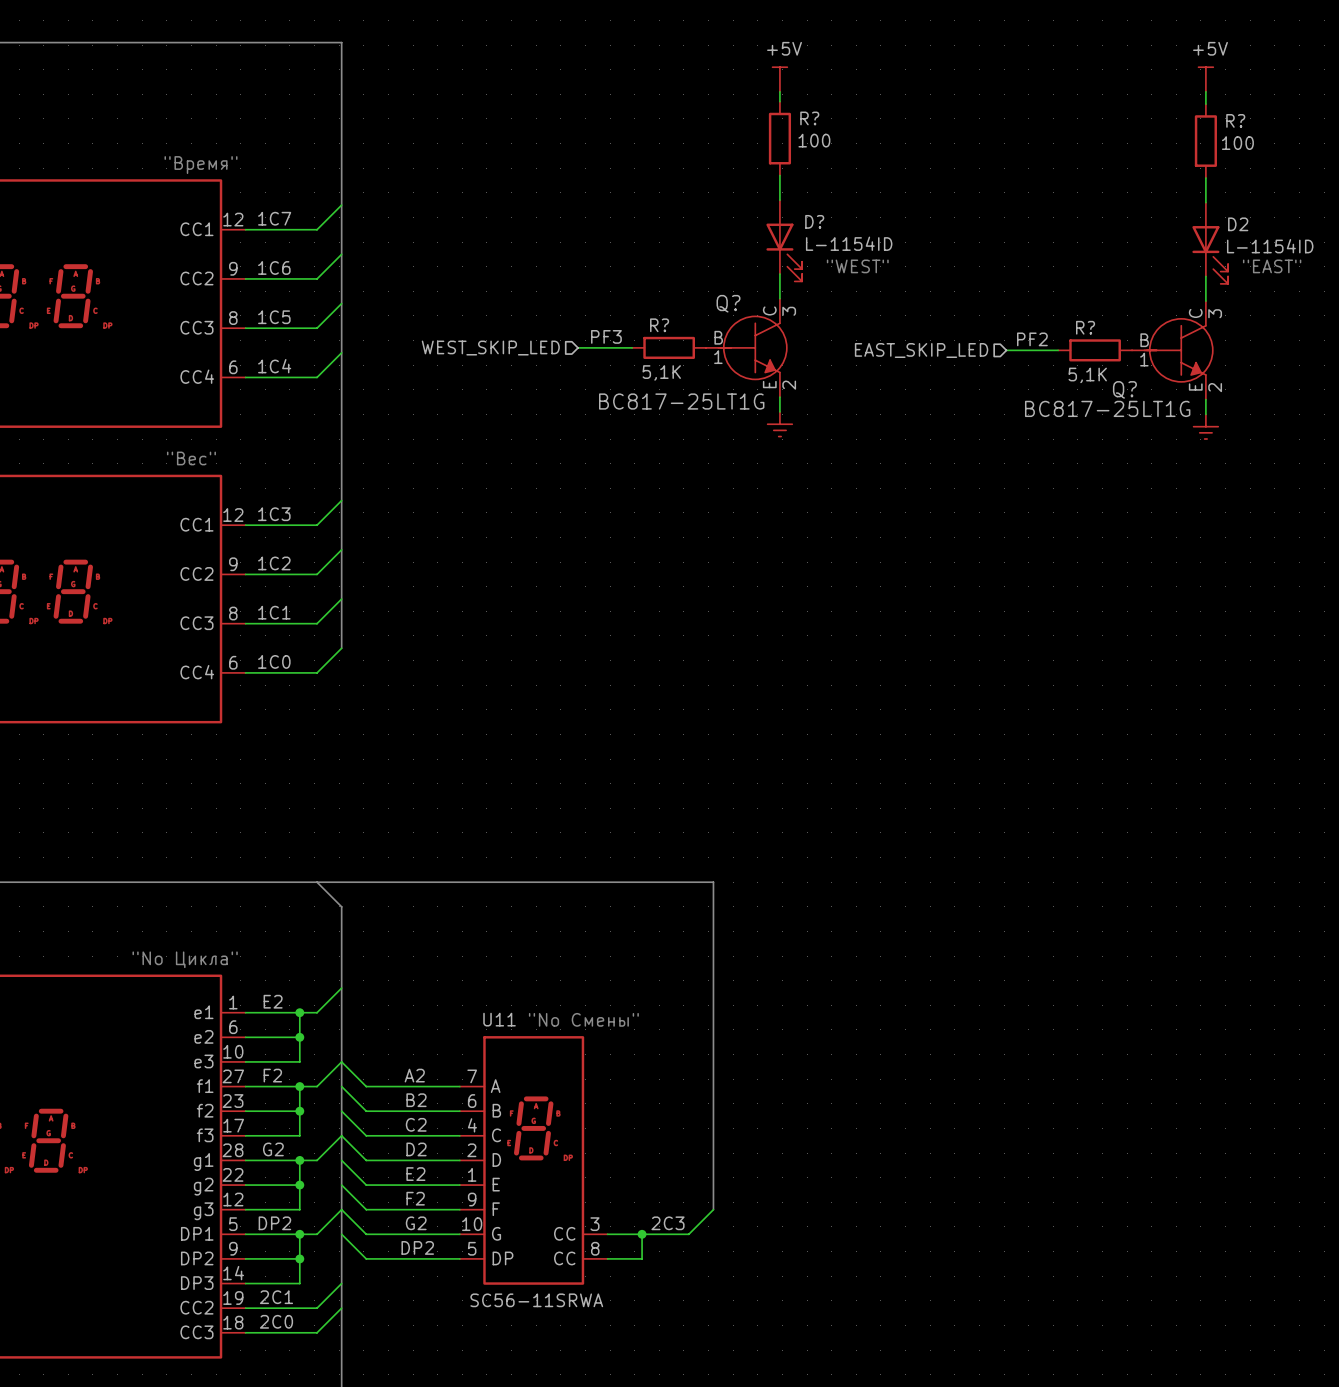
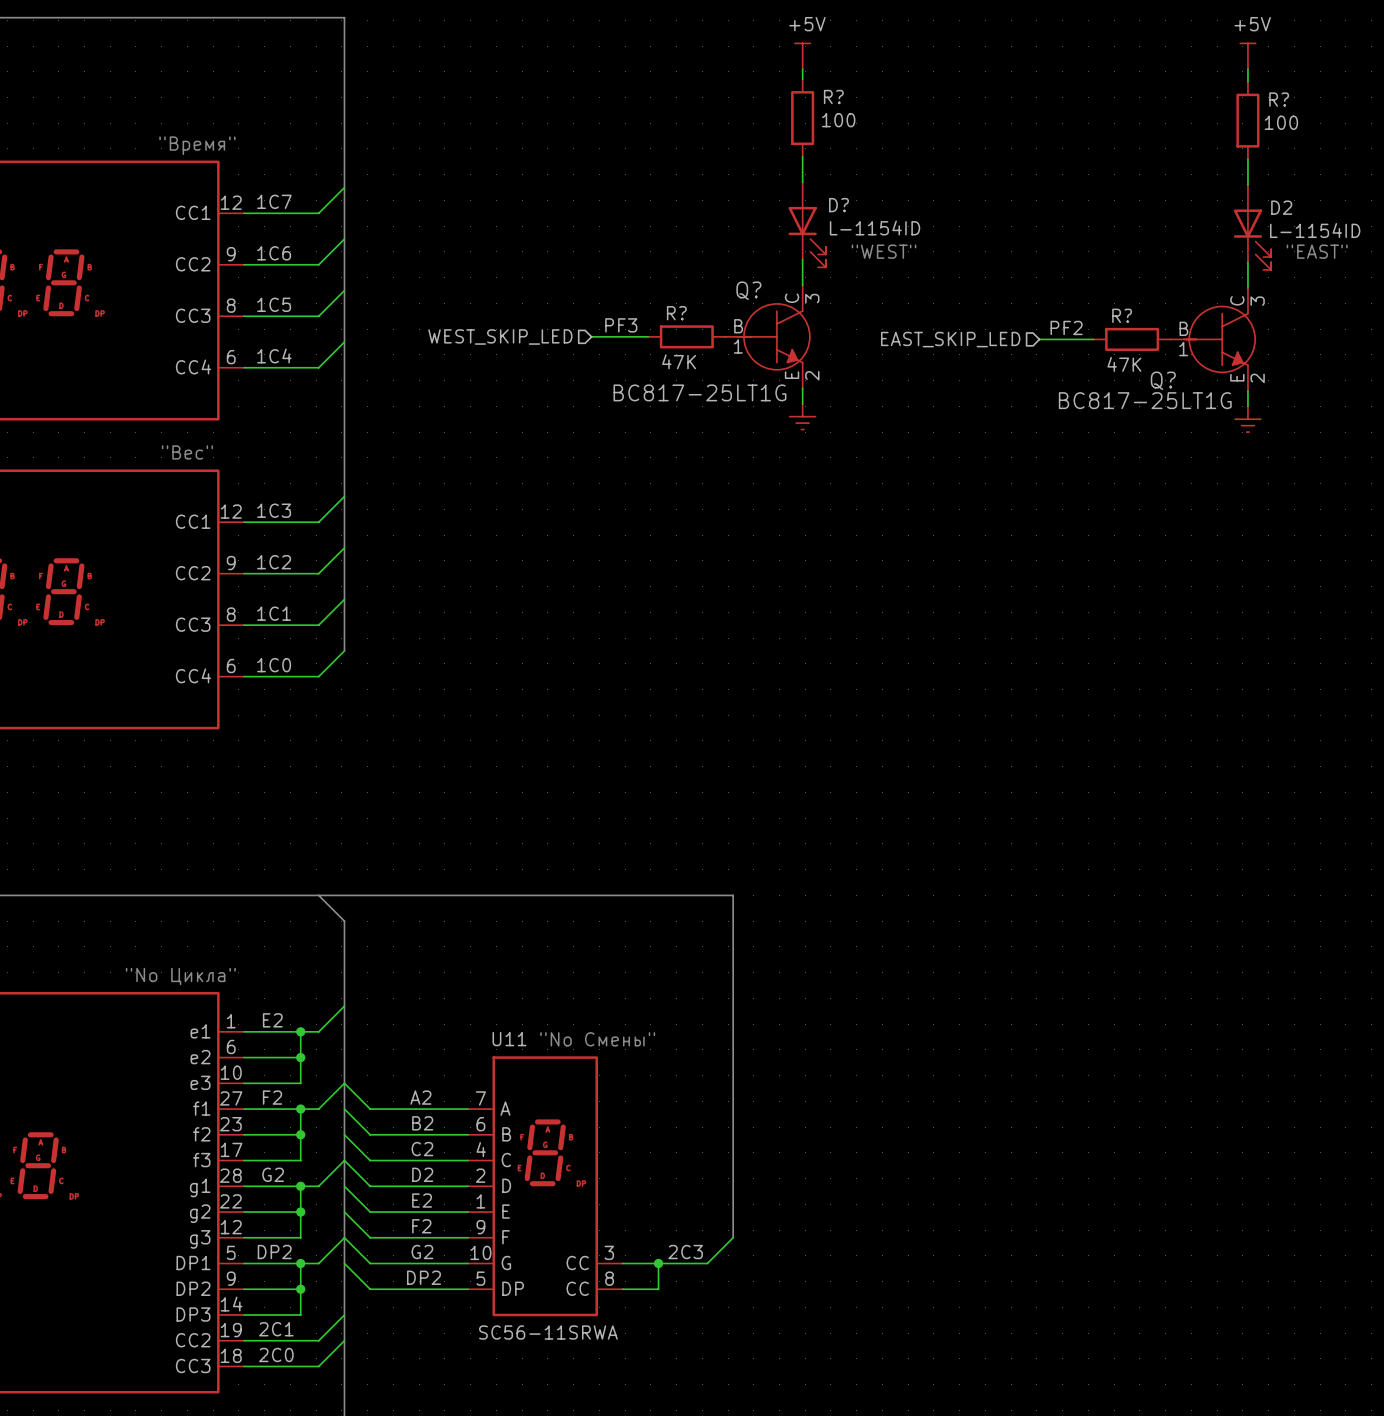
R? value: 5,1K (661, 372) -> 47K (679, 361)
R? value: 5,1K (1087, 375) -> 47K (1124, 364)

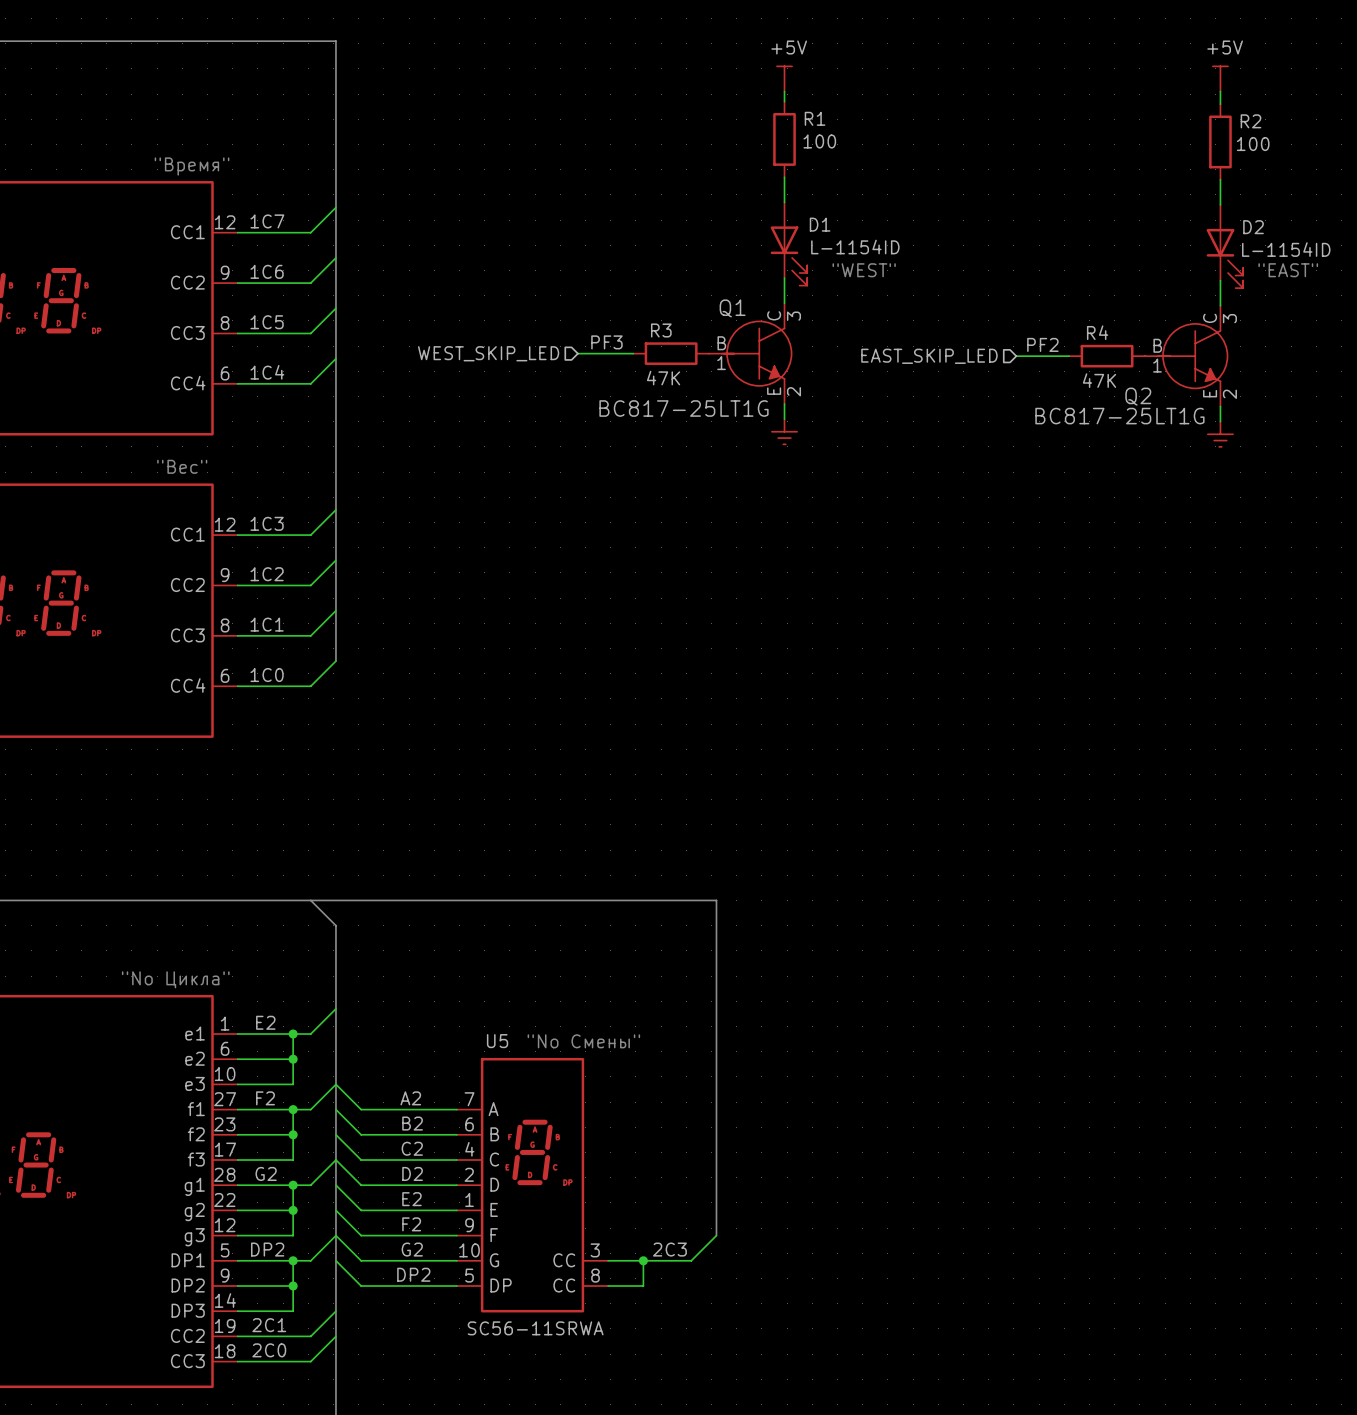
R? name: R? (833, 97) -> R1 (815, 118)
R? name: R? (1279, 99) -> R2 (1250, 121)
D? name: D? (838, 205) -> D1 (820, 224)
Q? name: Q? (748, 290) -> Q1 (732, 308)
R? name: R? (676, 313) -> R3 (661, 330)
R? name: R? (1122, 315) -> R4 (1097, 332)
Q? name: Q? (1163, 380) -> Q2 (1138, 396)
U11 name: U11 (509, 1039) -> U5 (497, 1041)

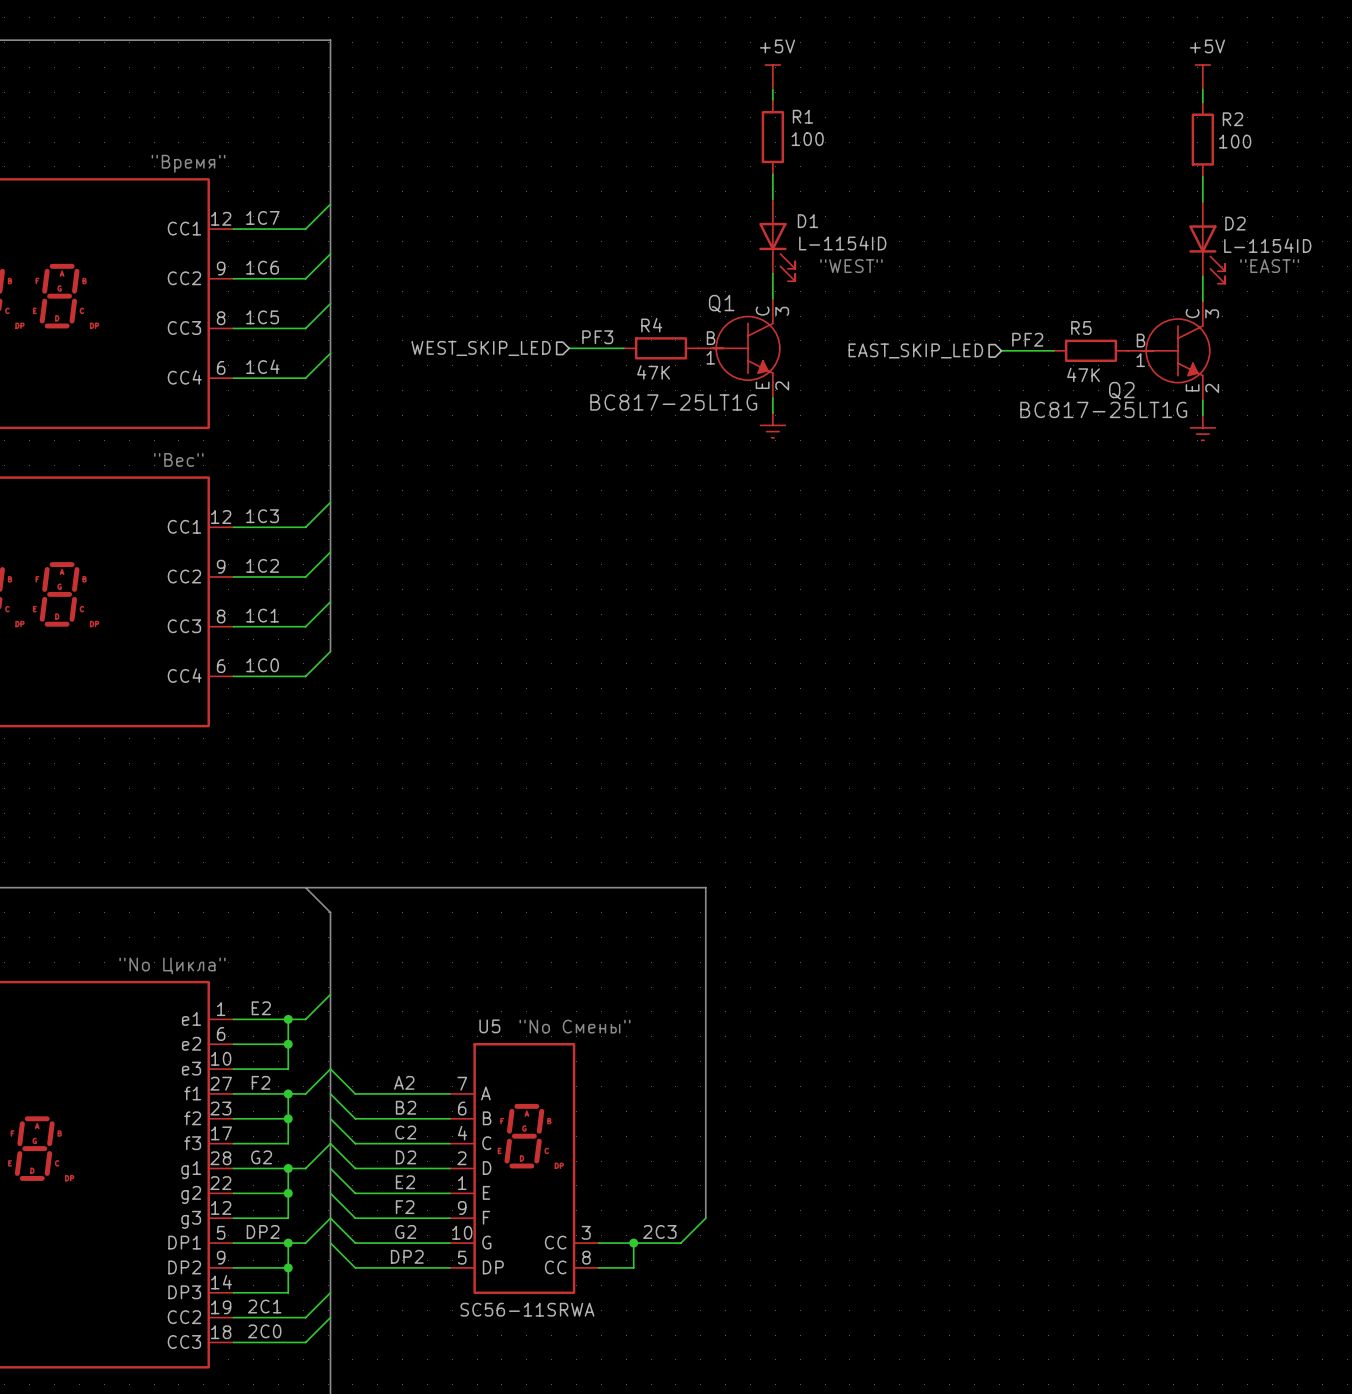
R3 name: R3 (661, 330) -> R4 (651, 325)
R4 name: R4 (1097, 332) -> R5 (1081, 327)

